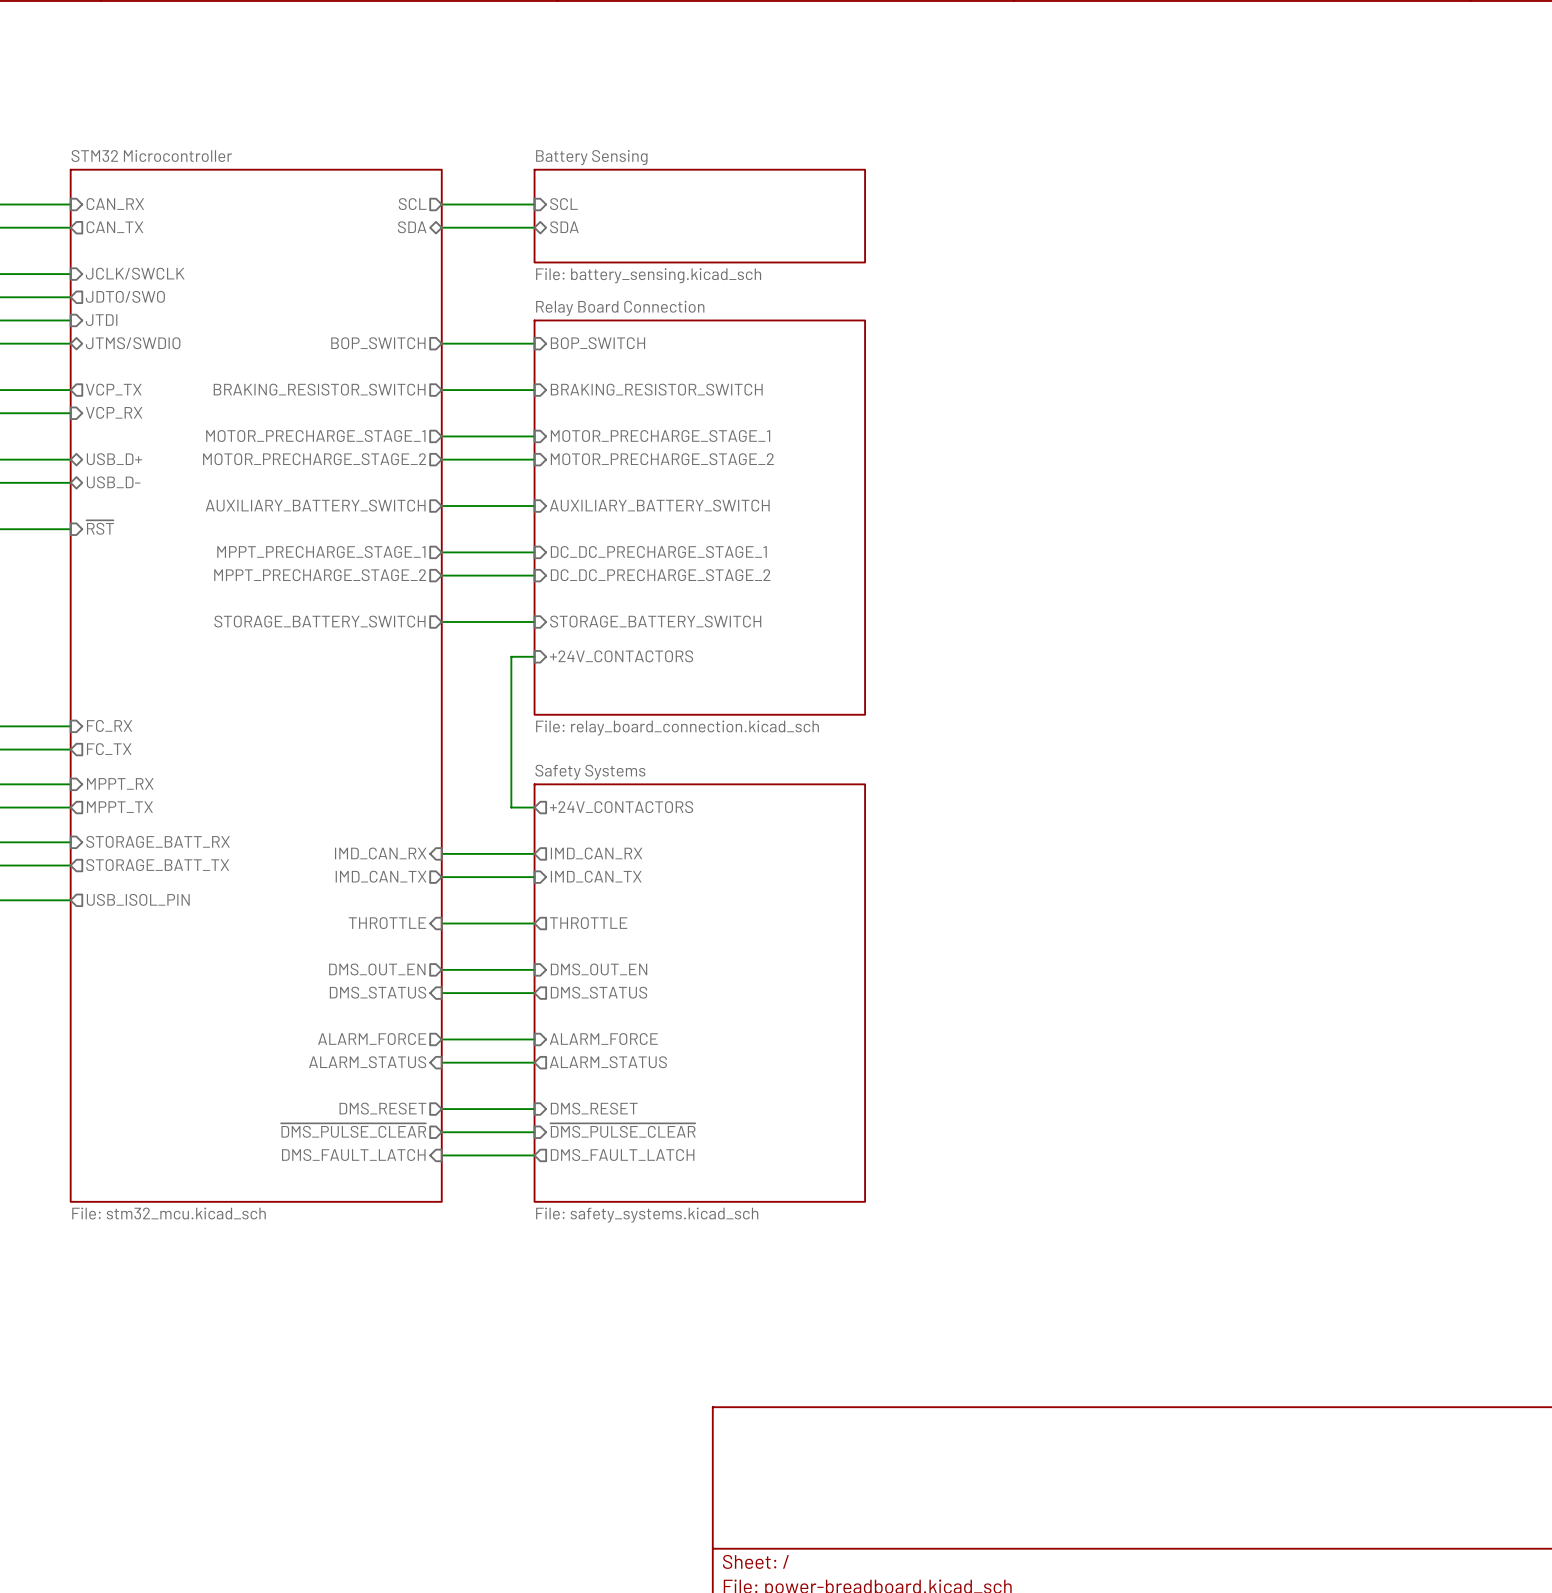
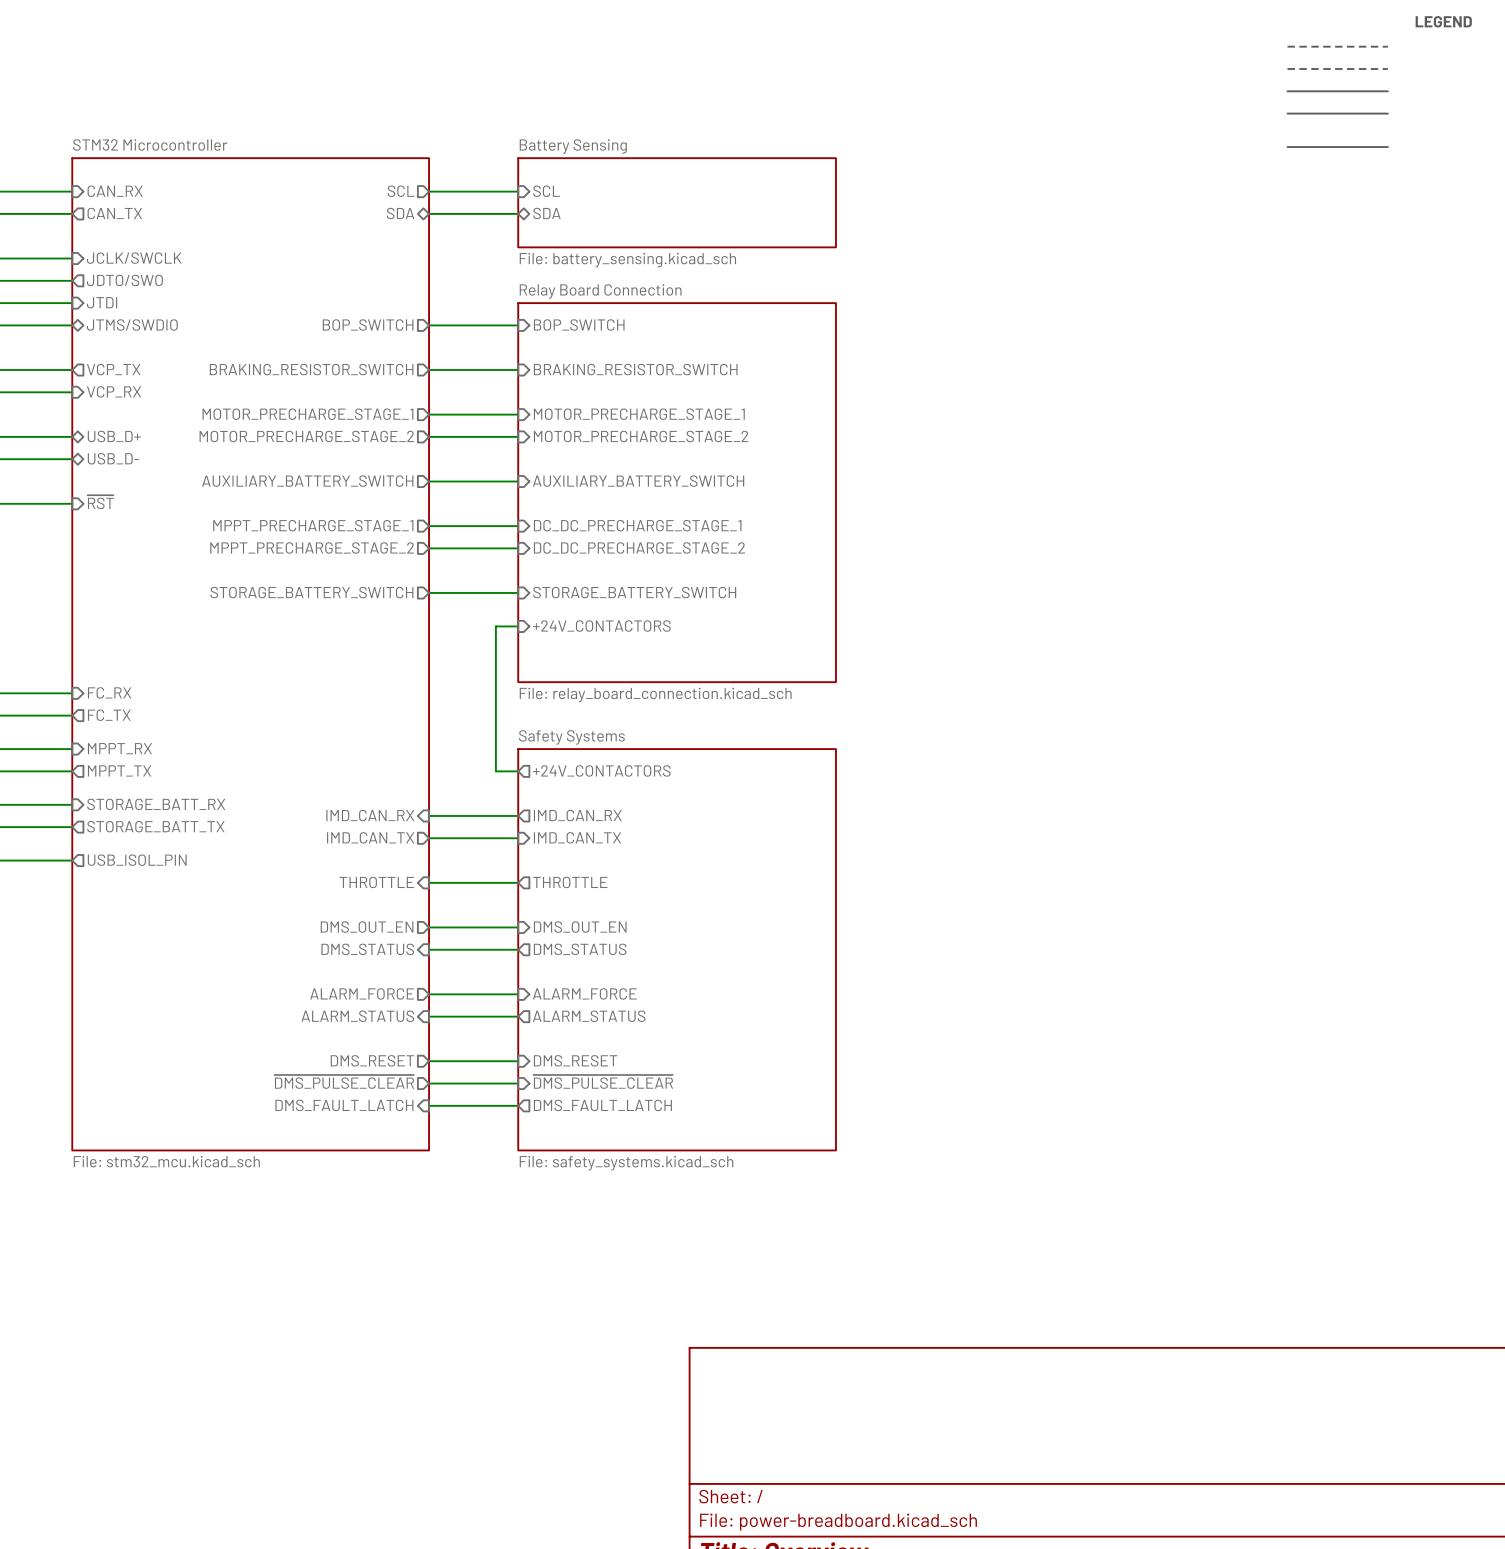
text: none -> LEGEND (1443, 21)
line: none -> (1287, 46) (1387, 46)
line: none -> (1287, 68) (1387, 68)
line: none -> (1287, 91) (1387, 91)
line: none -> (1287, 113) (1387, 113)
line: none -> (1287, 147) (1387, 147)

